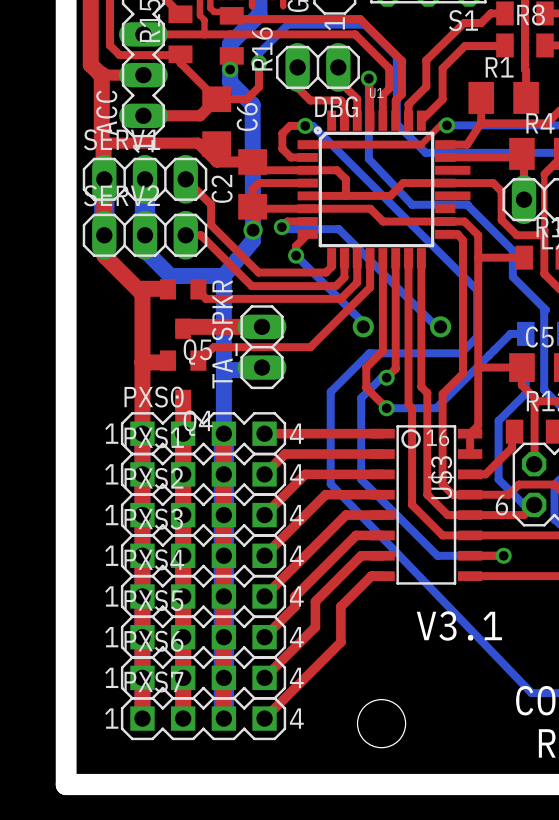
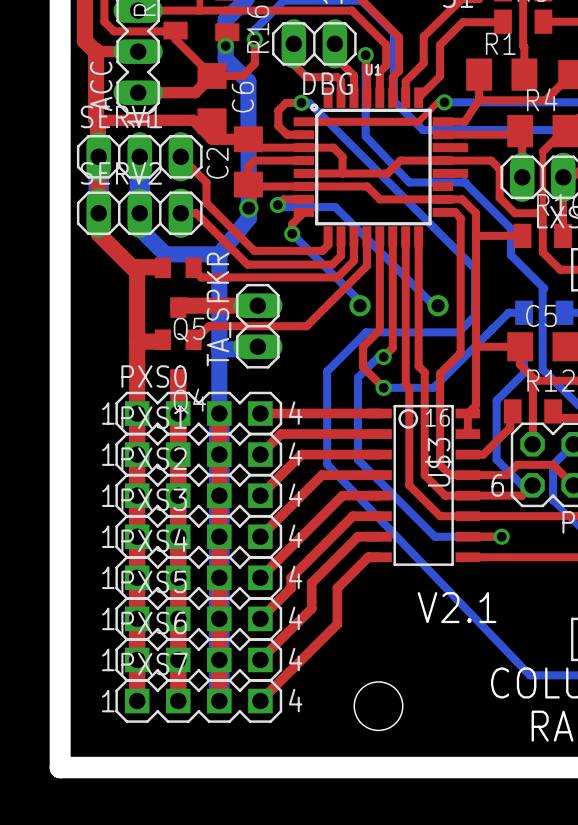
text: V3.1 (459, 625) -> V2.1 (457, 607)

